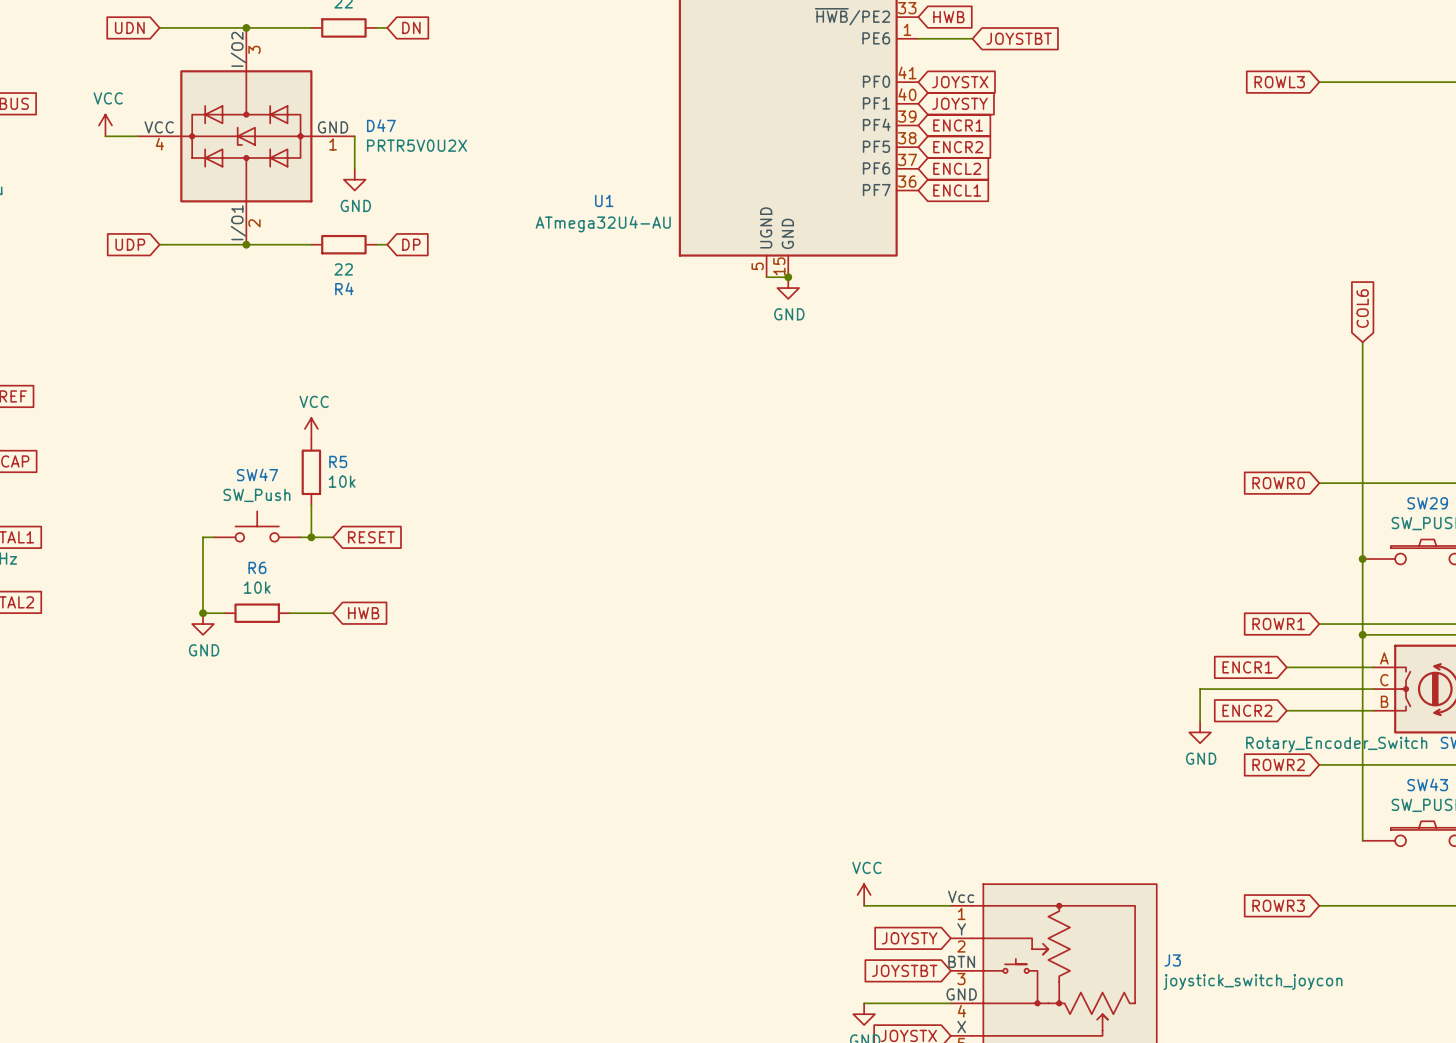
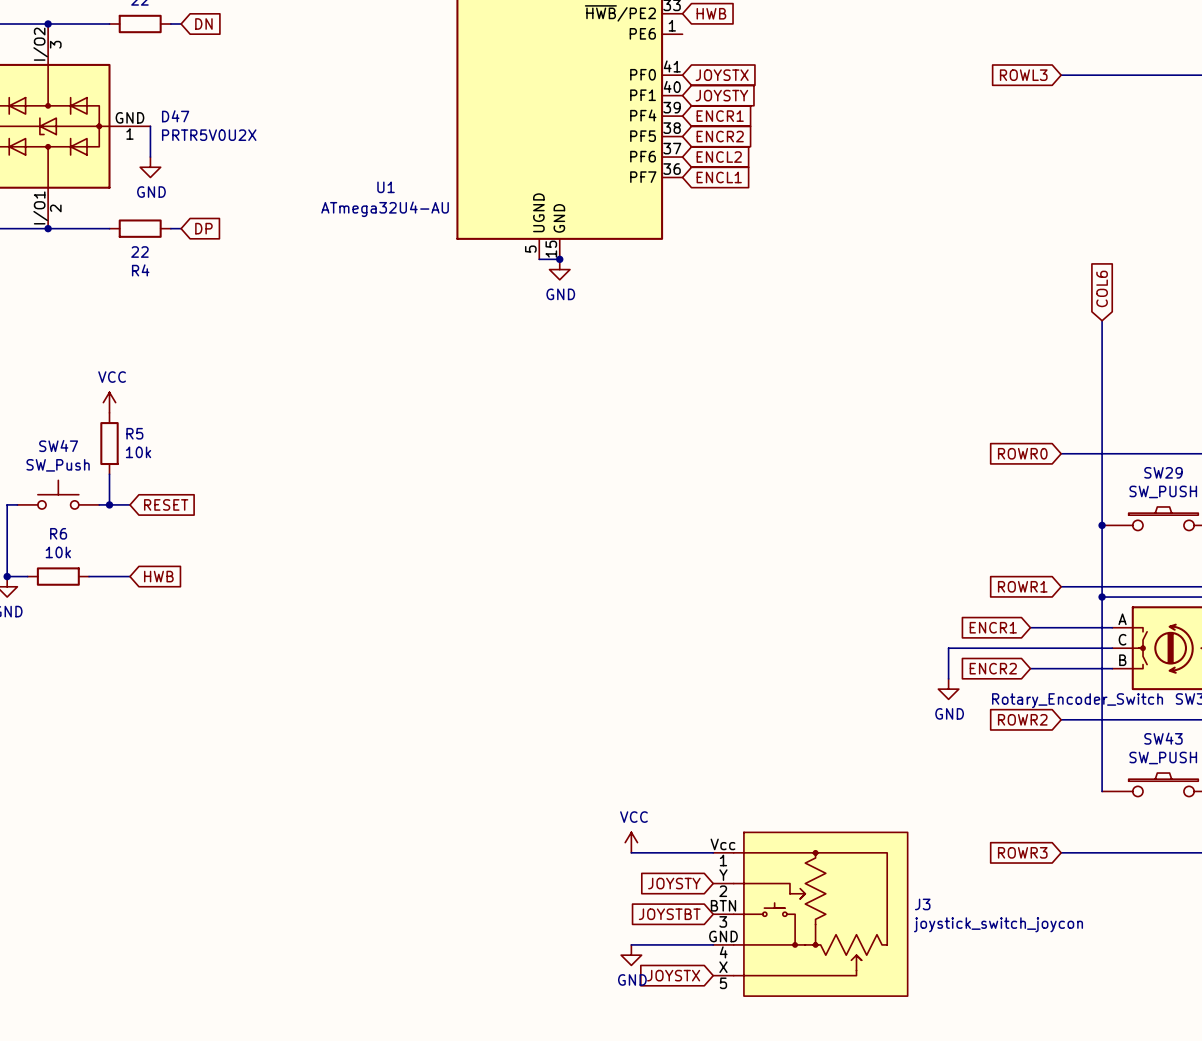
wire: (918, 38) (972, 38) -> none
global label: JOYSTBT (1019, 38) -> none

